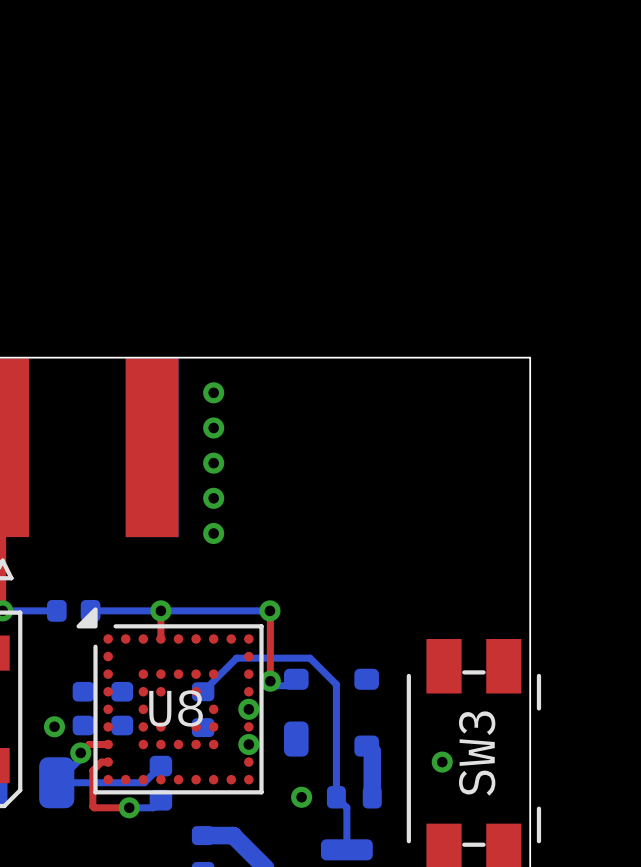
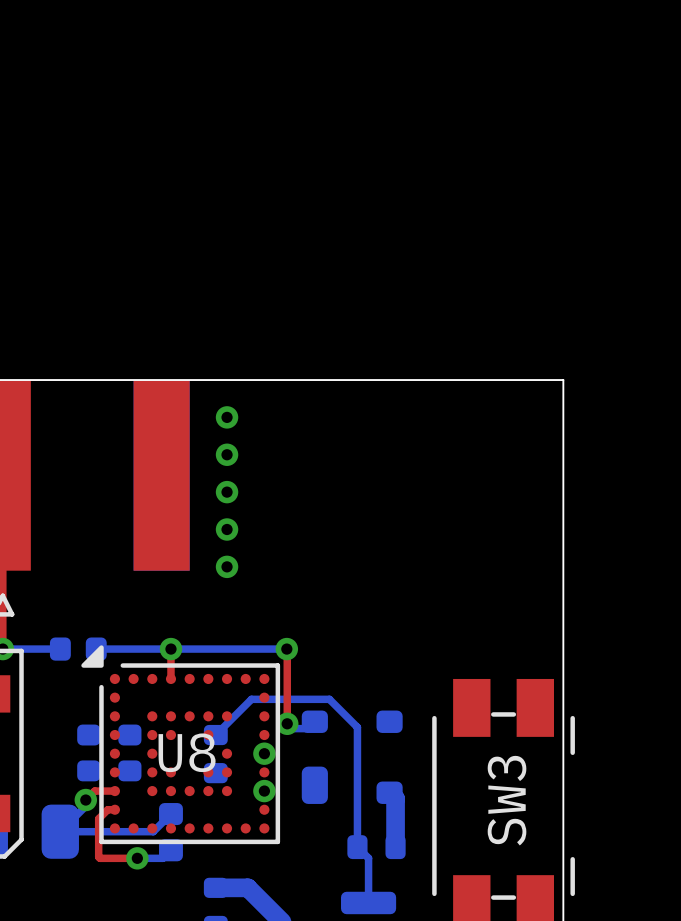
via: (54, 726) -> none
via: (442, 762) -> none
via: (301, 797) -> none

